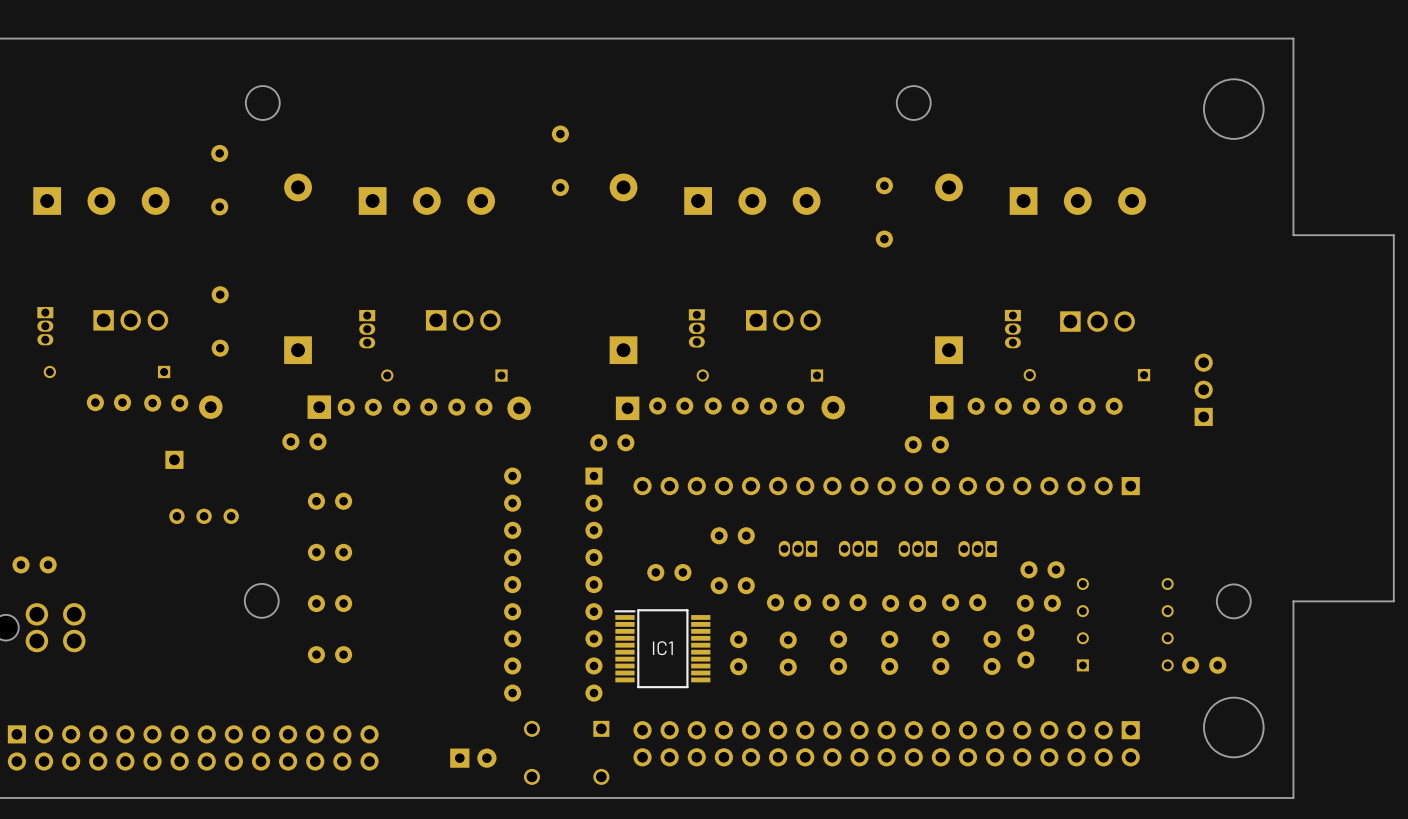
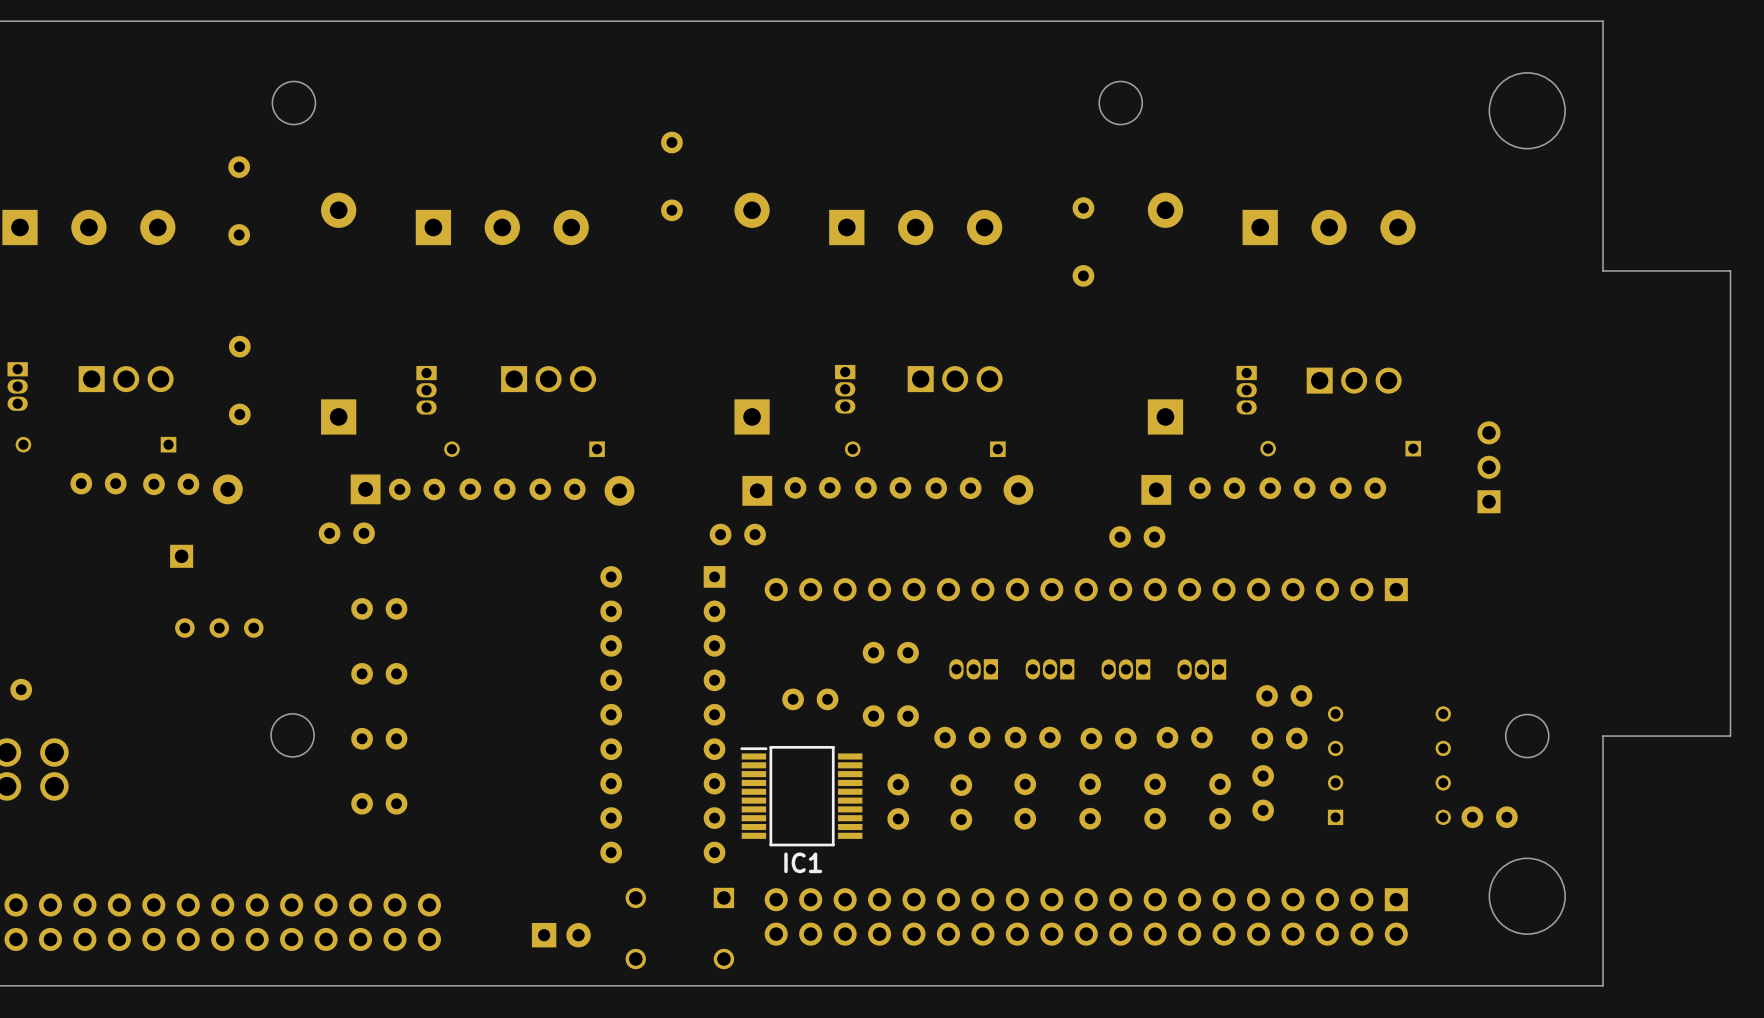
IC1 name position: IC1 (662, 648) -> IC1 (803, 862)

